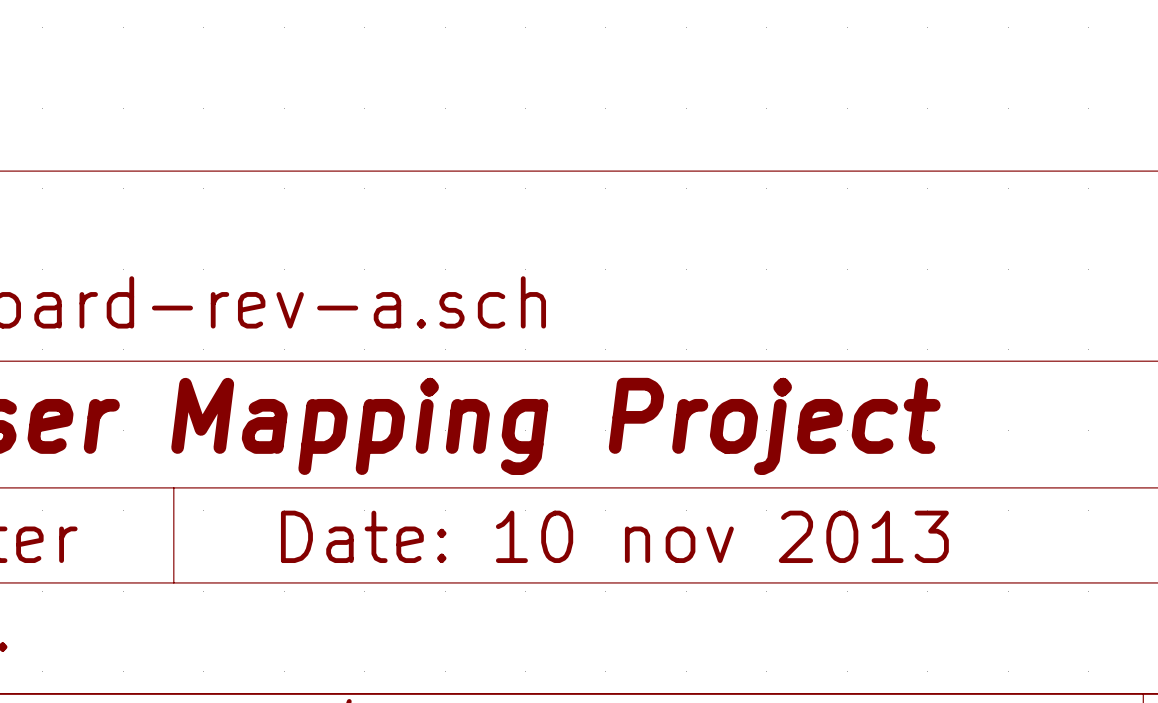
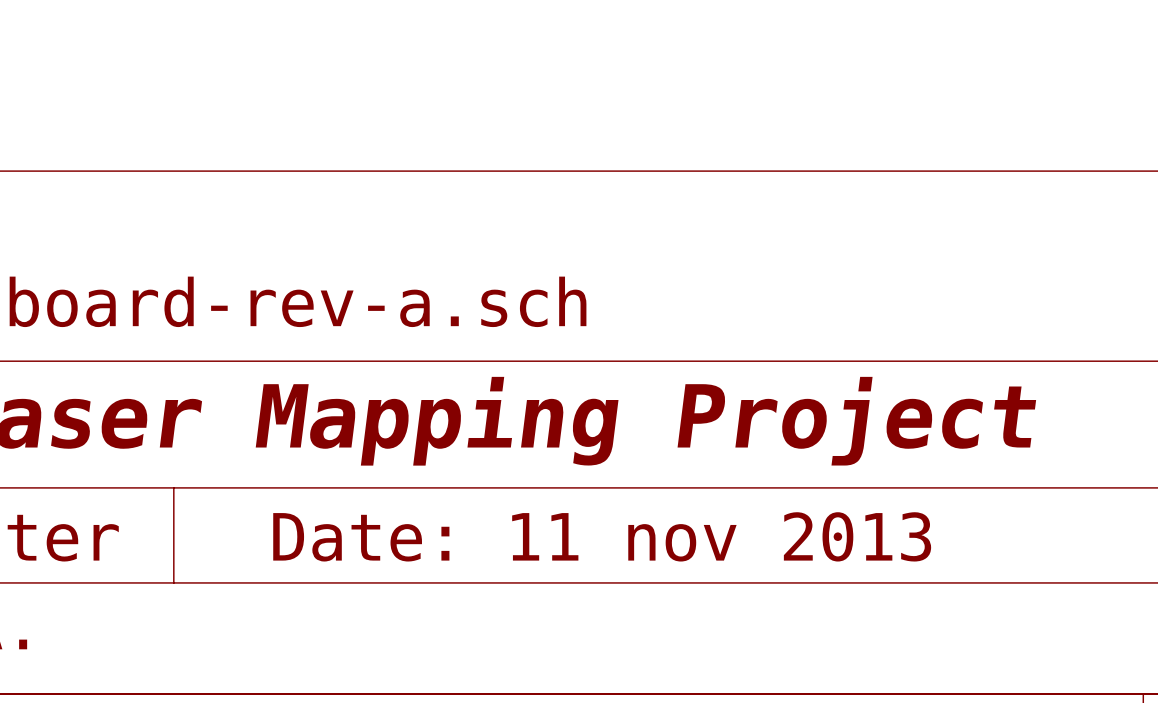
title block: Date: 10 nov 2013 (614, 536) -> Date: 11 nov 2013 (602, 536)

